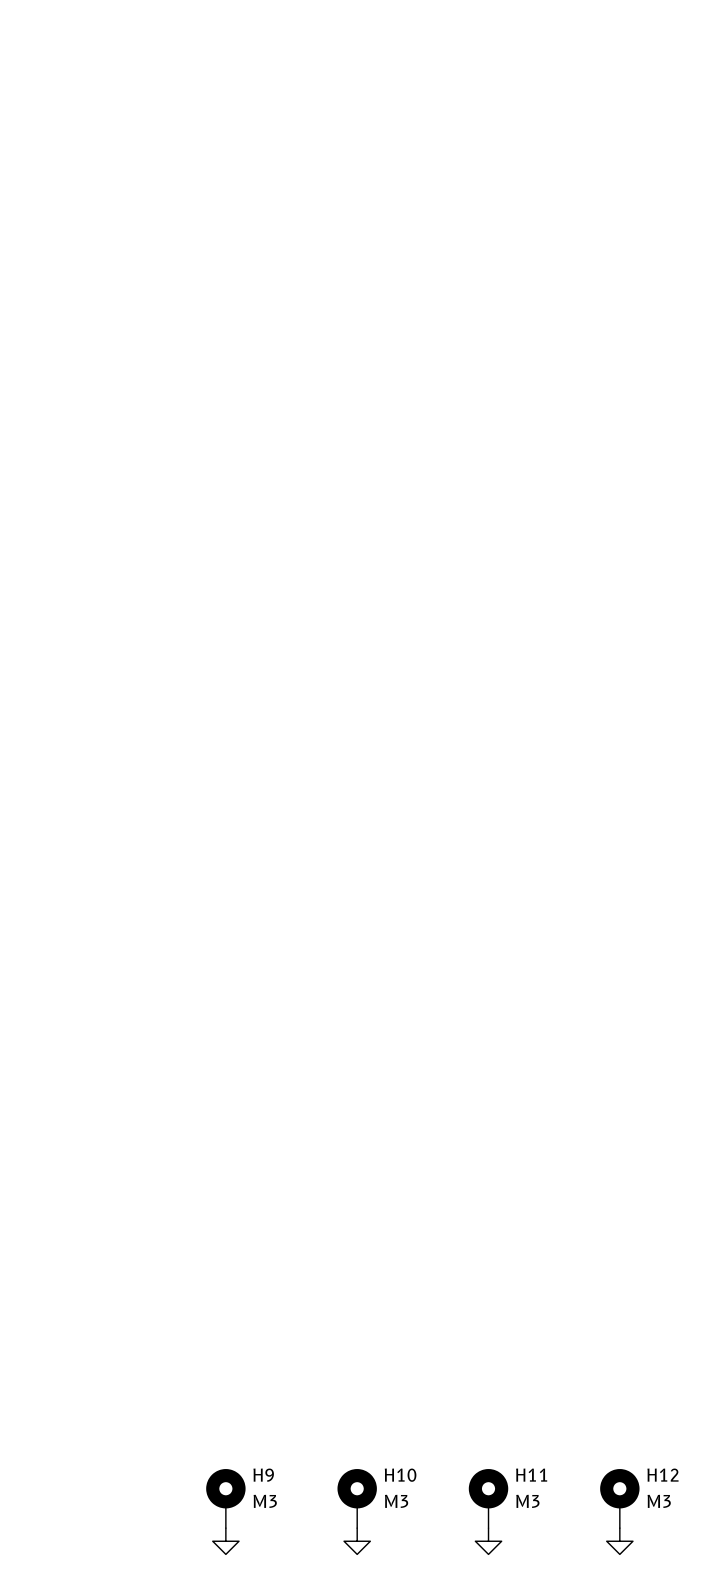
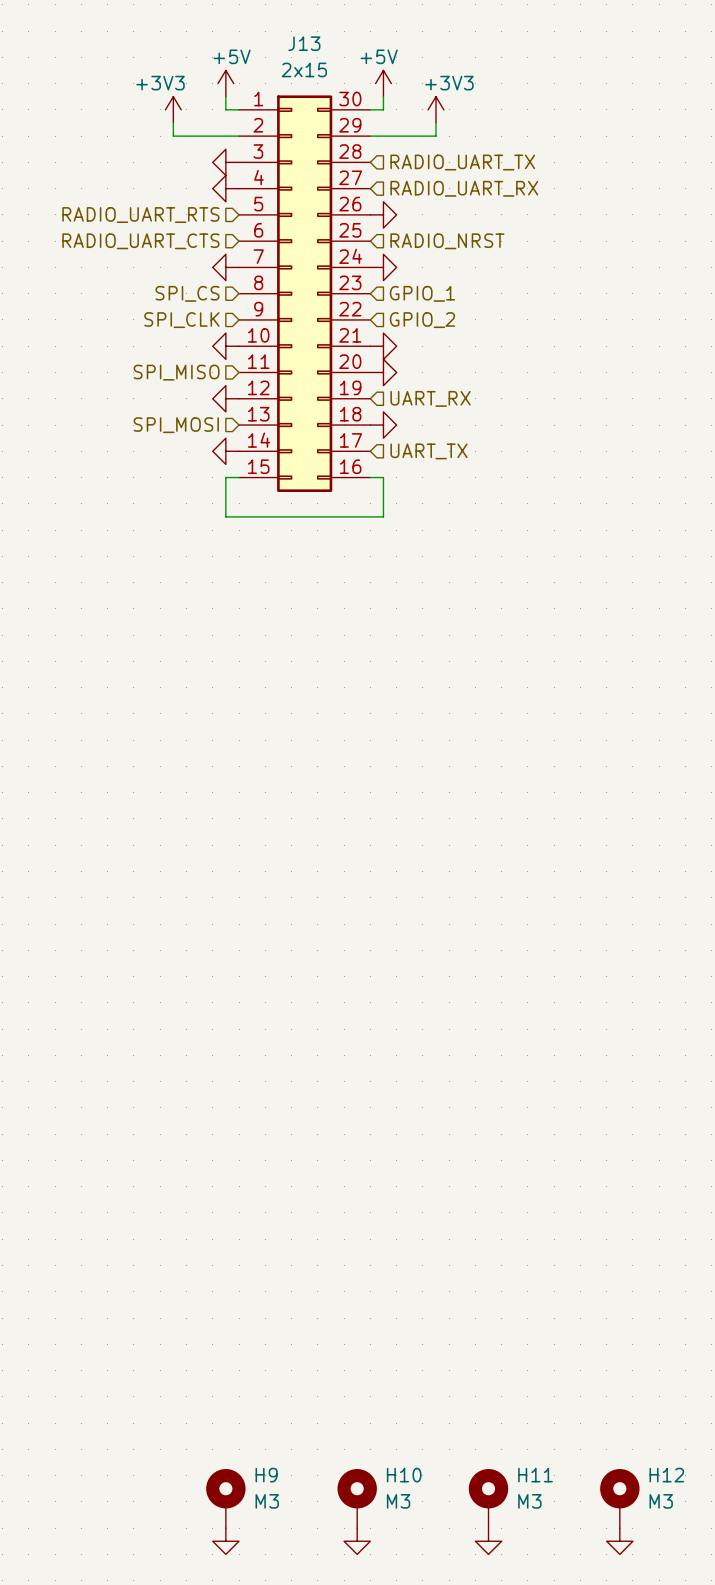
power symbol: none -> +5V (225, 83)
power symbol: none -> +5V (383, 83)
wire: none -> (225, 96) (225, 109) (239, 109)
wire: none -> (383, 96) (383, 109) (370, 109)
power symbol: none -> +3V3 (173, 109)
power symbol: none -> +3V3 (435, 109)
wire: none -> (173, 122) (173, 136) (239, 136)
wire: none -> (435, 122) (435, 136) (370, 136)
power symbol: none -> (225, 162)
hierarchical label: none -> RADIO_UART_TX (462, 162)
power symbol: none -> (225, 188)
hierarchical label: none -> RADIO_UART_RX (464, 188)
power symbol: none -> (383, 214)
hierarchical label: none -> RADIO_UART_RTS (140, 215)
hierarchical label: none -> RADIO_UART_CTS (140, 241)
hierarchical label: none -> RADIO_NRST (447, 241)
power symbol: none -> (225, 267)
power symbol: none -> (383, 267)
J13: none -> 2x15 (304, 293)
hierarchical label: none -> SPI_CS (187, 293)
hierarchical label: none -> GPIO_1 (422, 293)
hierarchical label: none -> SPI_CLK (181, 320)
hierarchical label: none -> GPIO_2 (422, 320)
power symbol: none -> (225, 346)
power symbol: none -> (383, 346)
power symbol: none -> (383, 372)
hierarchical label: none -> SPI_MISO (176, 372)
power symbol: none -> (225, 398)
hierarchical label: none -> UART_RX (430, 398)
power symbol: none -> (383, 425)
hierarchical label: none -> SPI_MOSI (176, 425)
power symbol: none -> (225, 451)
hierarchical label: none -> UART_TX (429, 451)
wire: none -> (239, 477) (225, 477) (225, 516) (383, 516) (383, 477) (370, 477)

